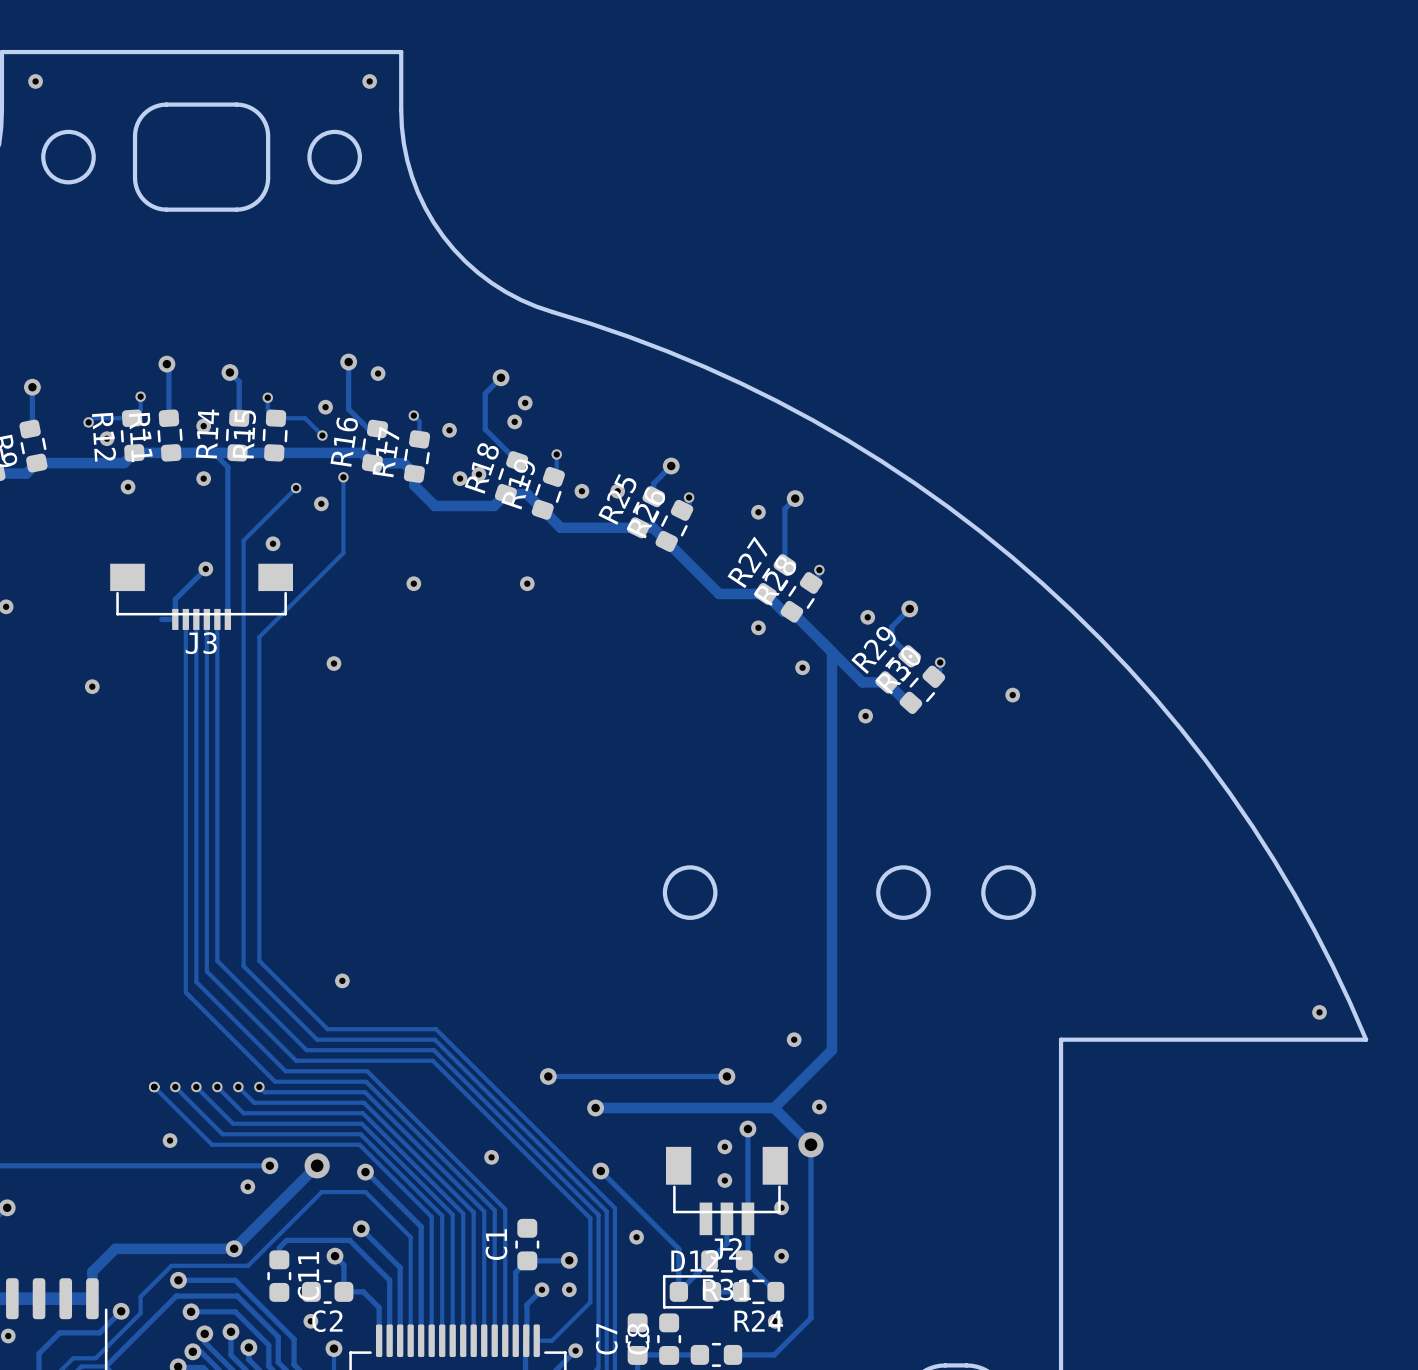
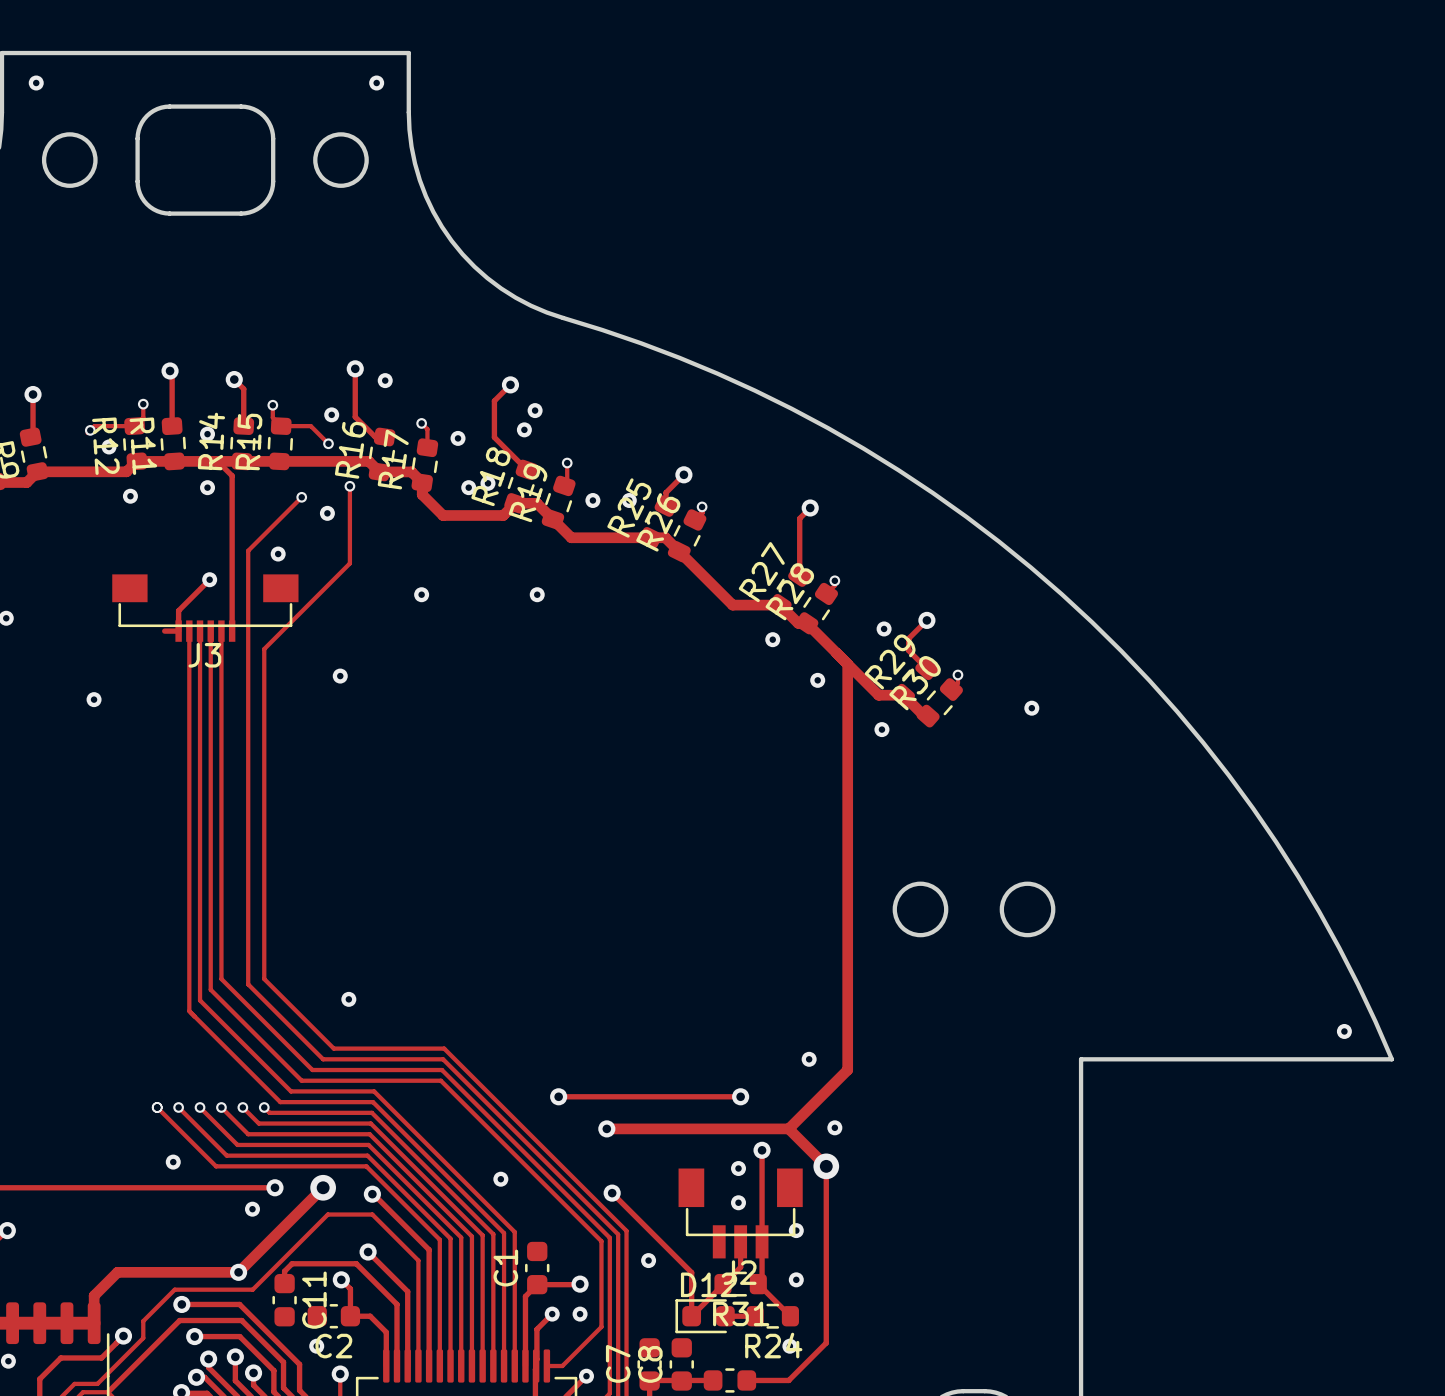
via: (758, 512) -> none
round board edge: [662, 865, 718, 920] -> none

